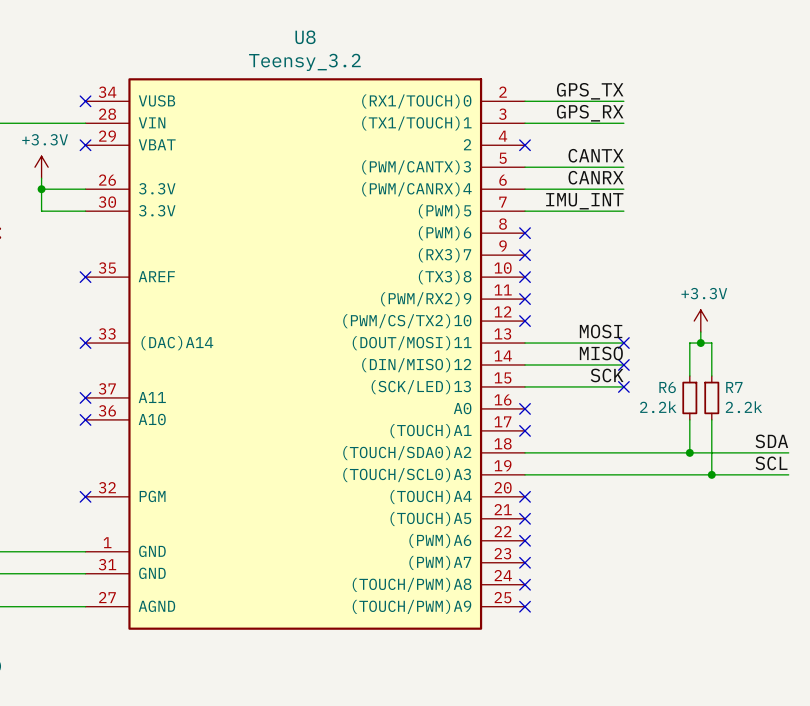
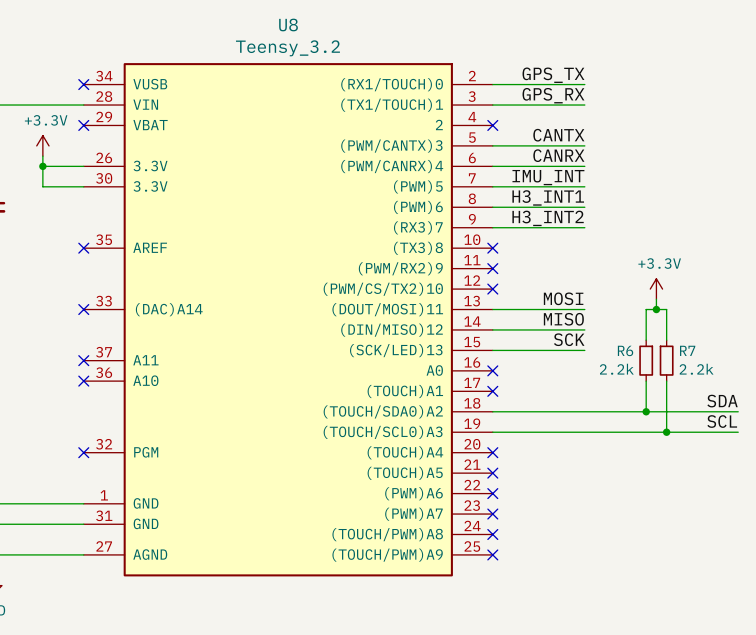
label: none -> H3_INT1 (548, 197)
wire: none -> (492, 207) (584, 207)
no-connect mark: (525, 233) -> none
label: none -> H3_INT2 (548, 218)
wire: none -> (492, 227) (584, 227)
no-connect mark: (525, 255) -> none
no-connect mark: (623, 343) -> none
no-connect mark: (623, 364) -> none
no-connect mark: (623, 386) -> none

